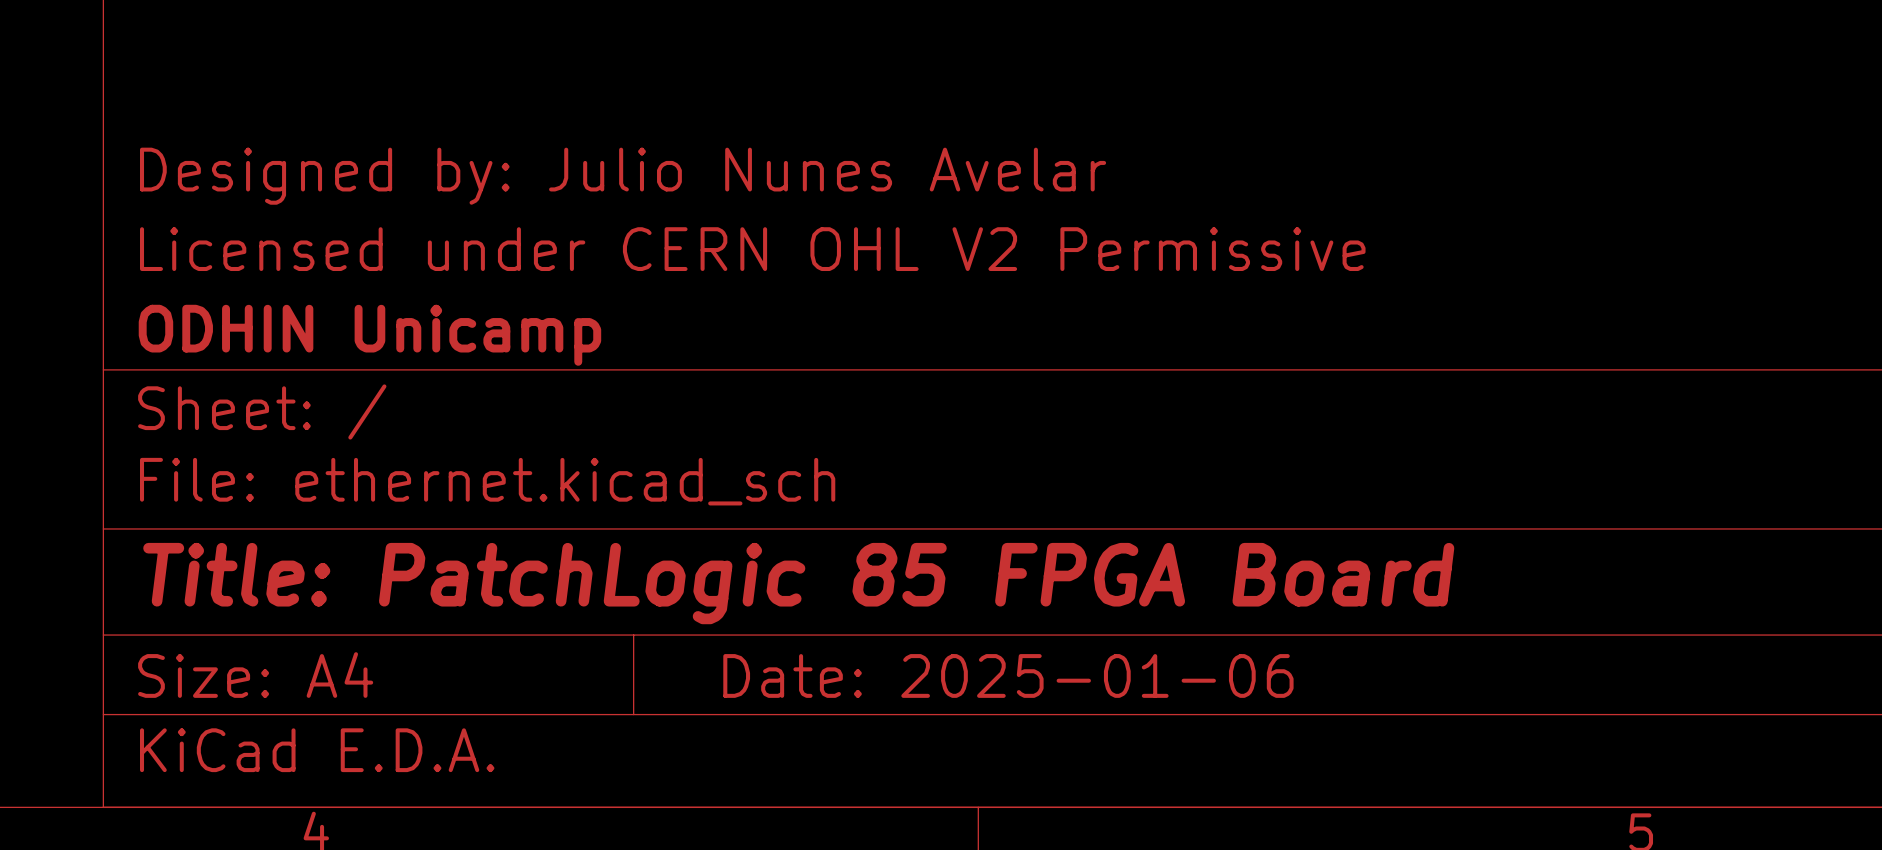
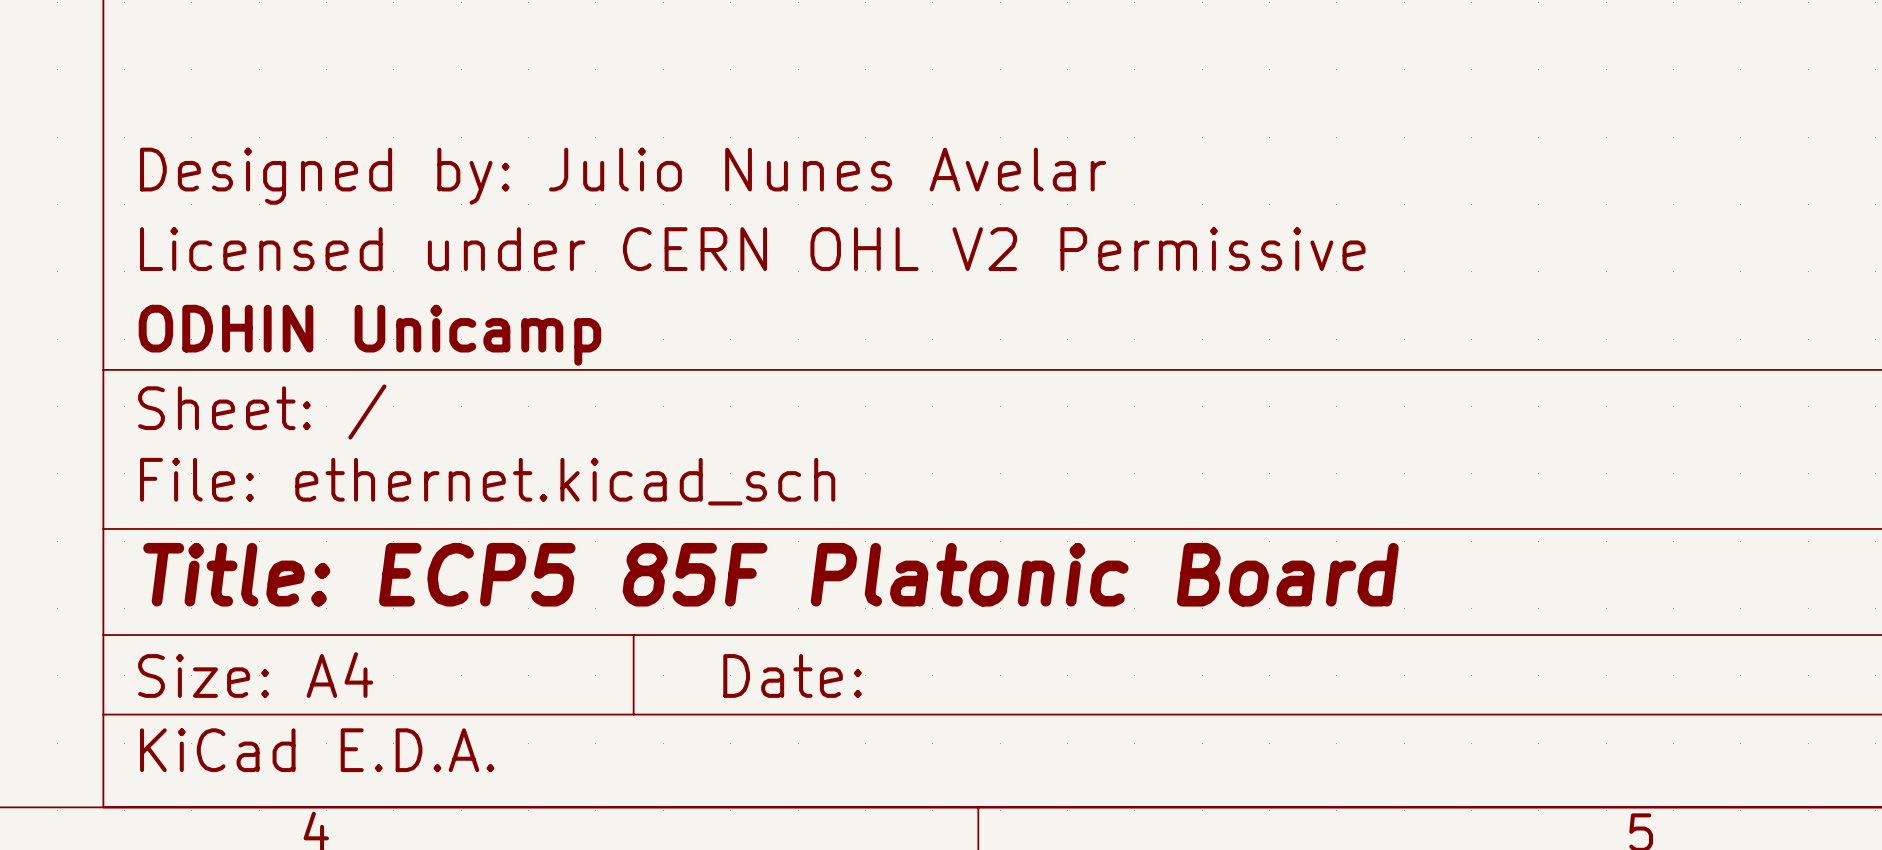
title block: Title: PatchLogic 85 FPGA Board (798, 583) -> Title: ECP5 85F Platonic Board (770, 574)
title block: Date: 2025-01-06 (1008, 675) -> Date: (792, 675)

